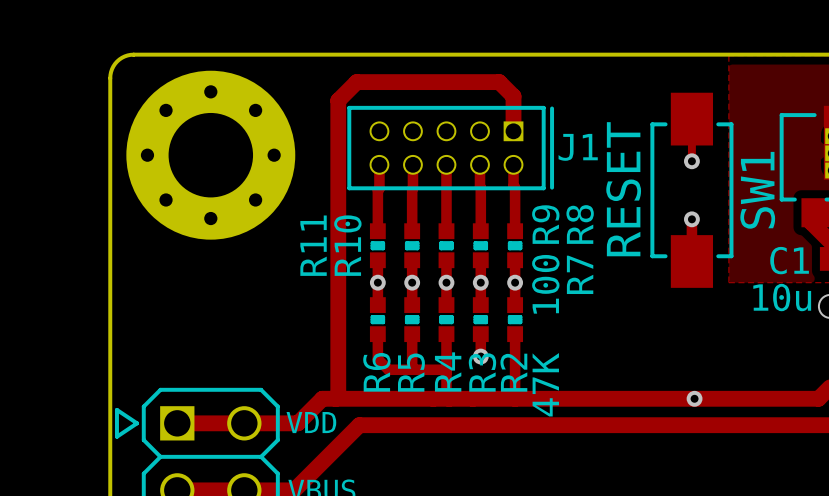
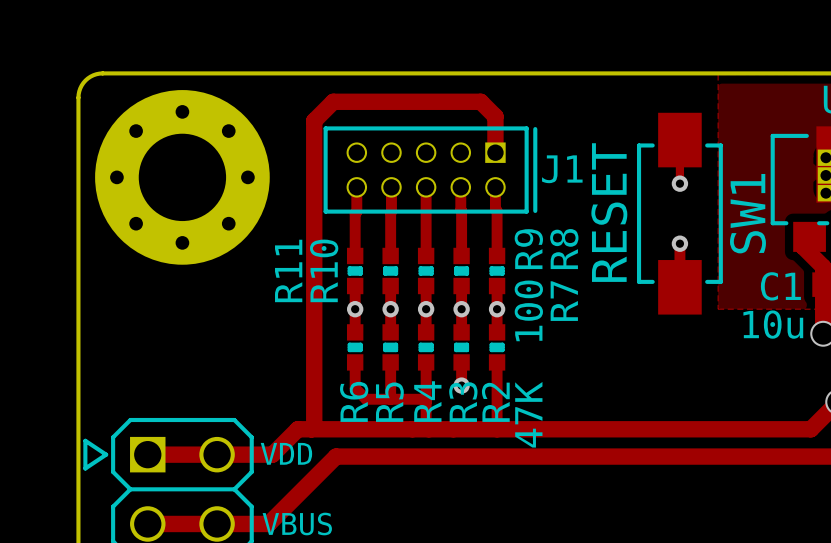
via: (694, 398) -> none

